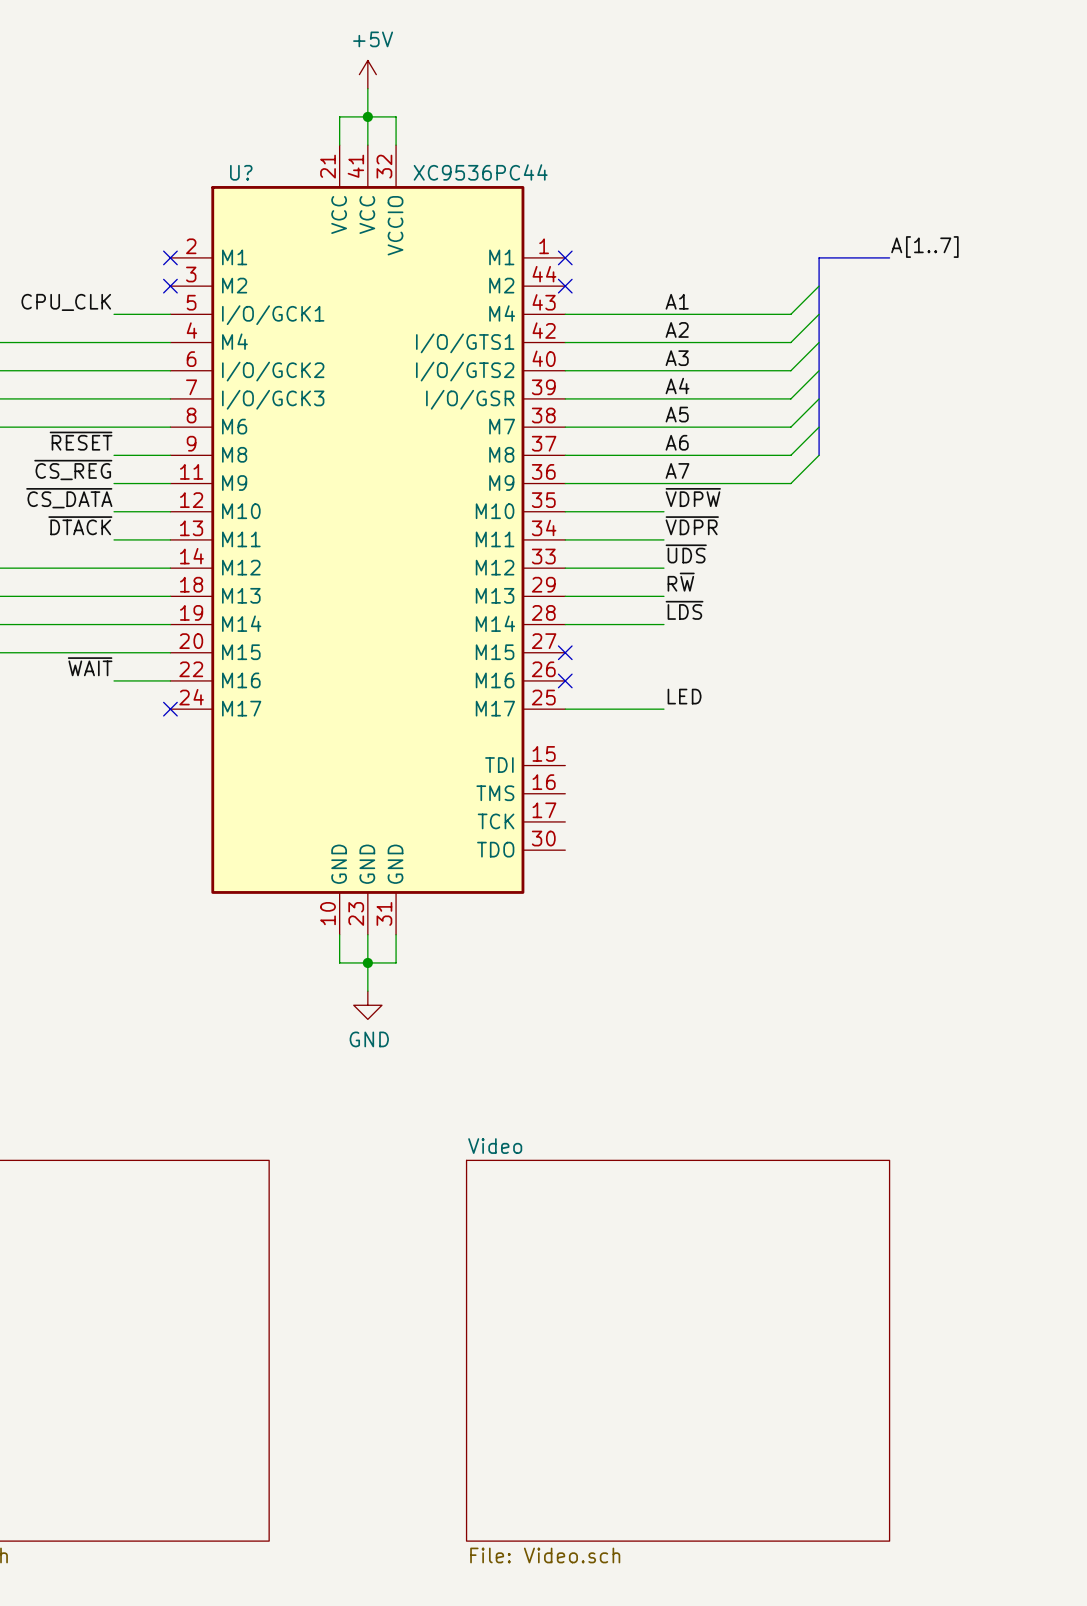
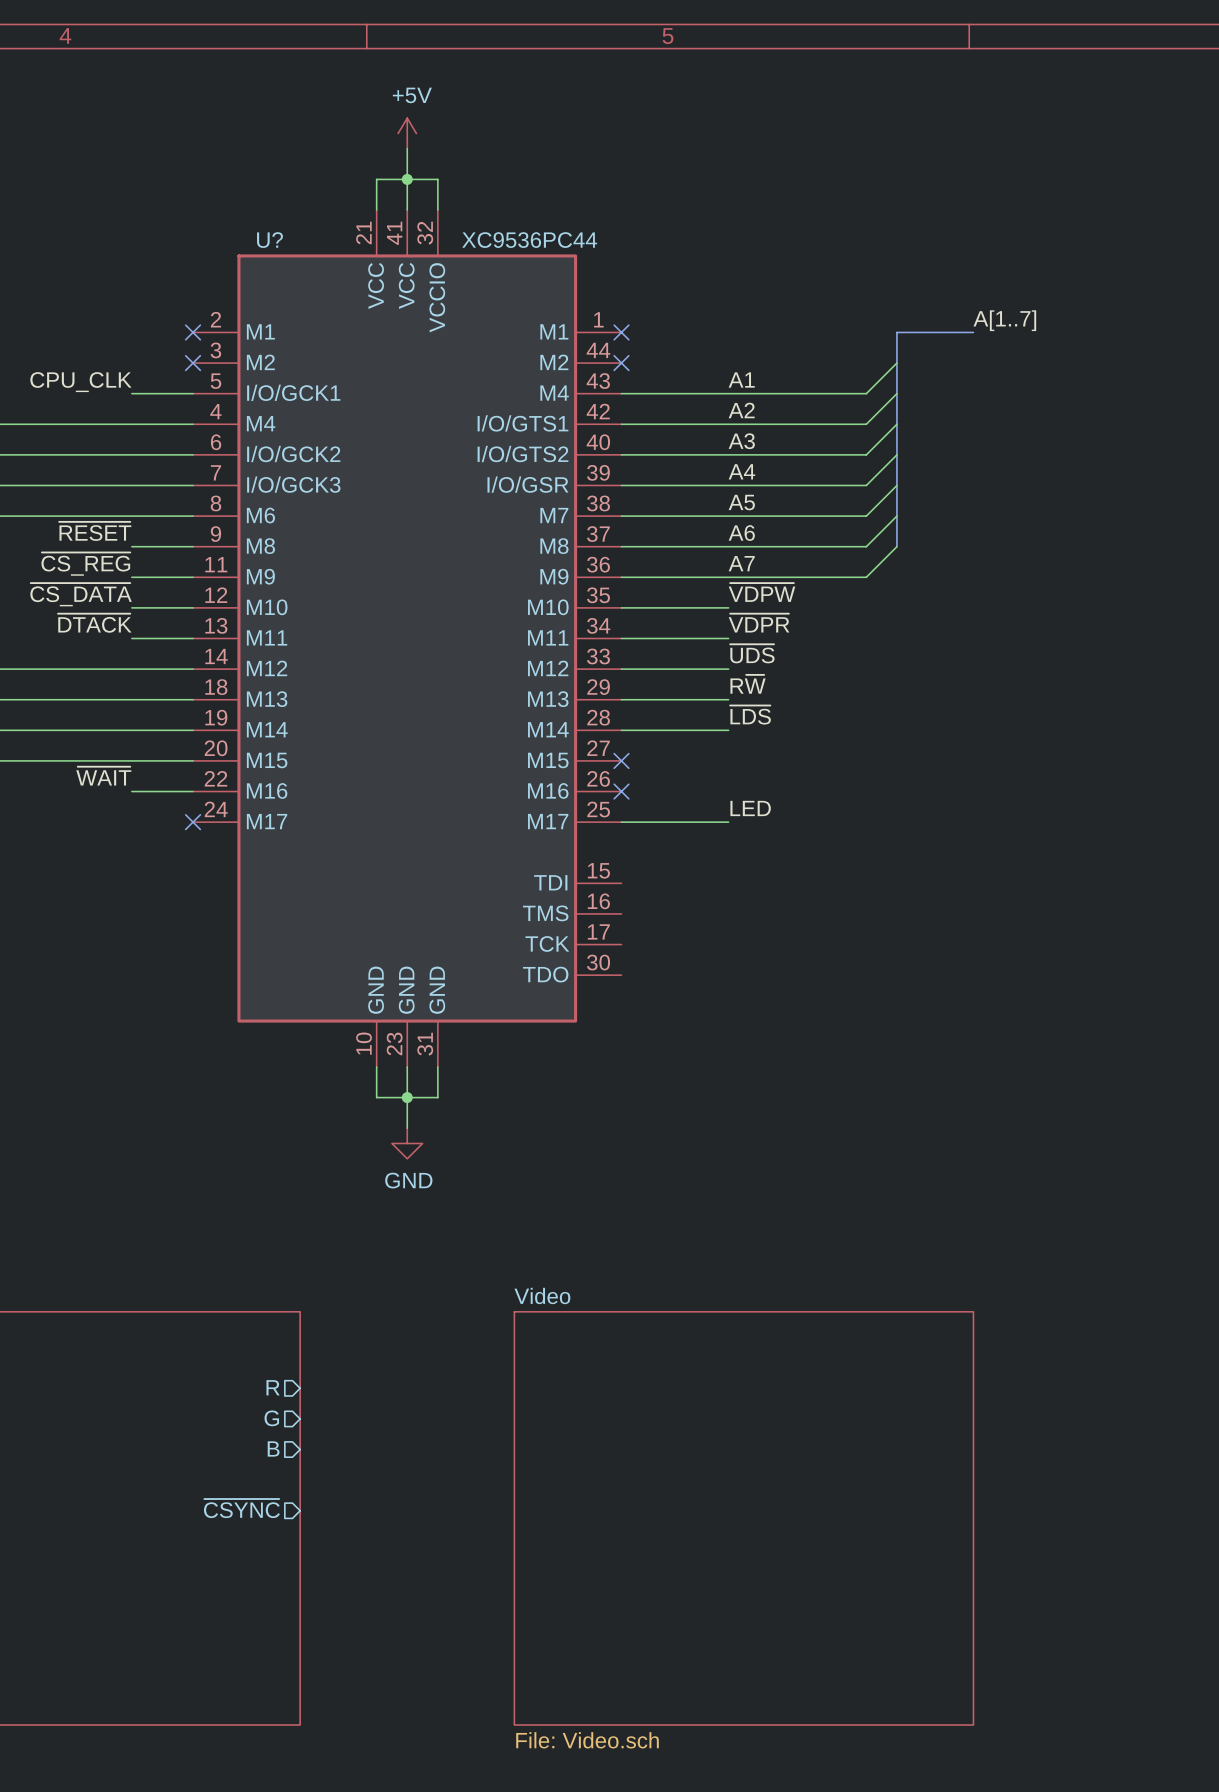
sheet pin: none -> R (273, 1387)
sheet pin: none -> G (271, 1418)
sheet pin: none -> B (273, 1448)
sheet pin: none -> ~{CSYNC} (241, 1508)

